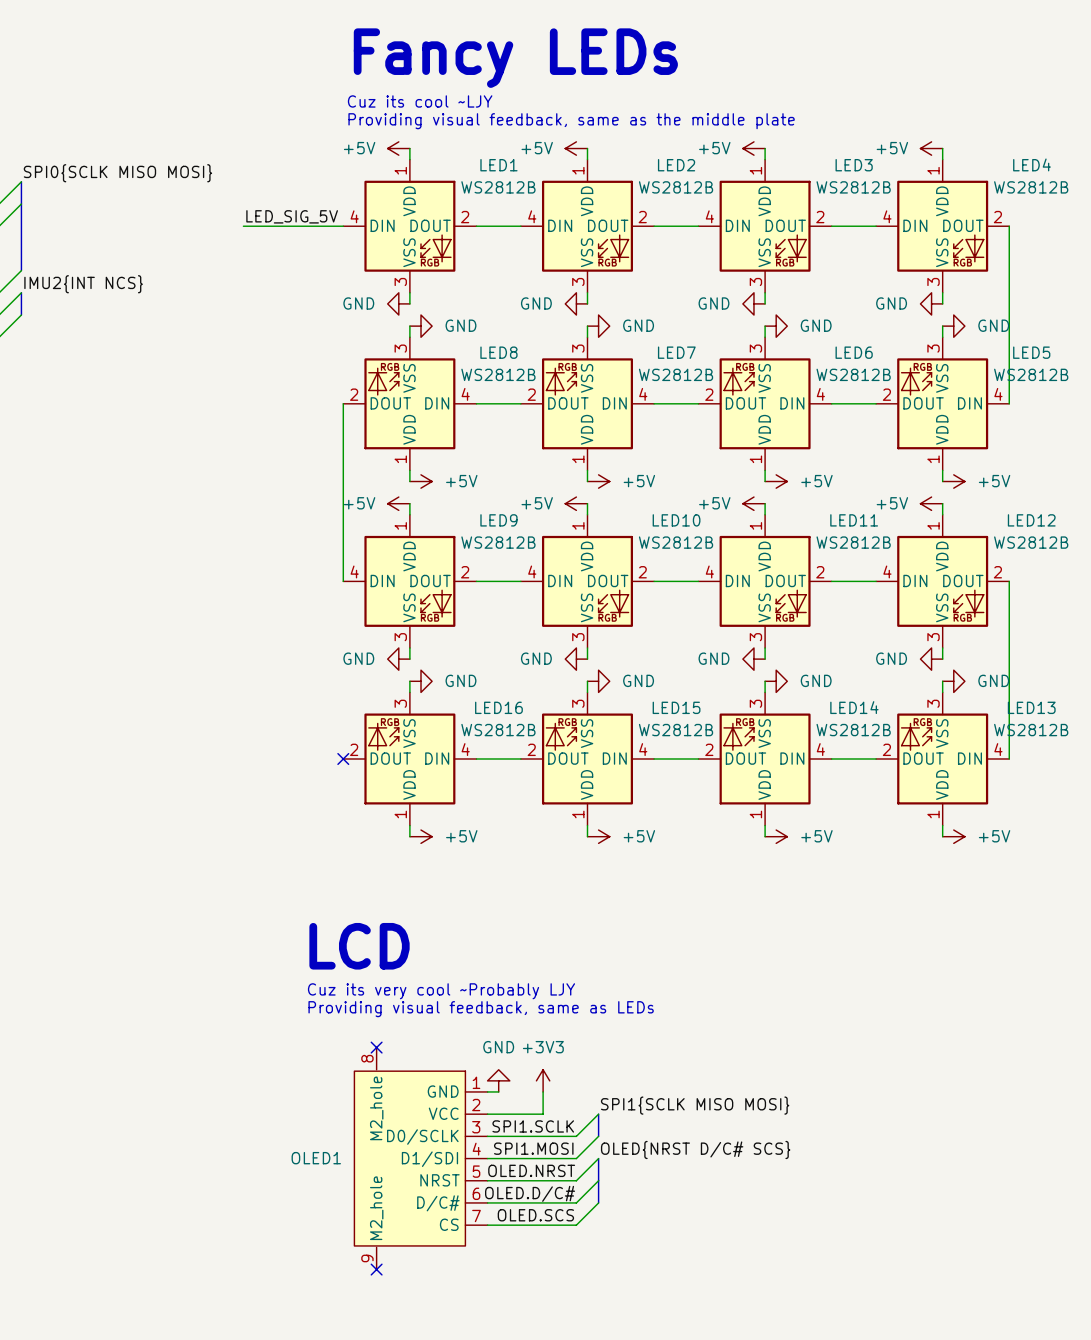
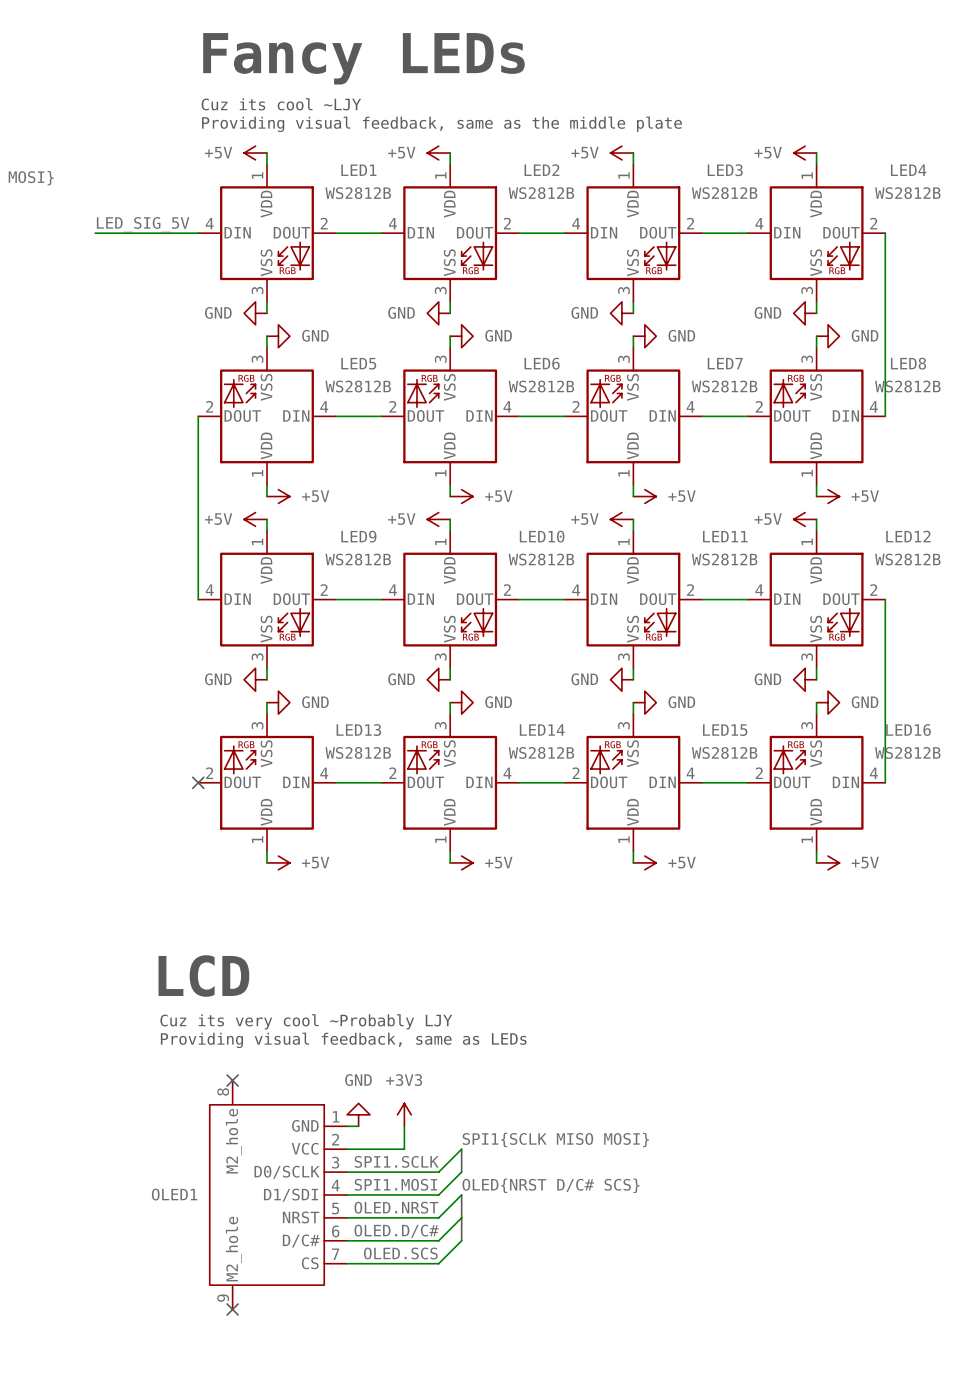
LED8 name: LED8 (498, 352) -> LED5 (358, 363)
LED7 name: LED7 (676, 352) -> LED6 (542, 363)
LED6 name: LED6 (854, 352) -> LED7 (725, 363)
LED5 name: LED5 (1031, 352) -> LED8 (908, 363)
LED16 name: LED16 (498, 707) -> LED13 (358, 730)
LED15 name: LED15 (676, 707) -> LED14 (542, 730)
LED14 name: LED14 (854, 707) -> LED15 (725, 730)
LED13 name: LED13 (1031, 707) -> LED16 (908, 730)

